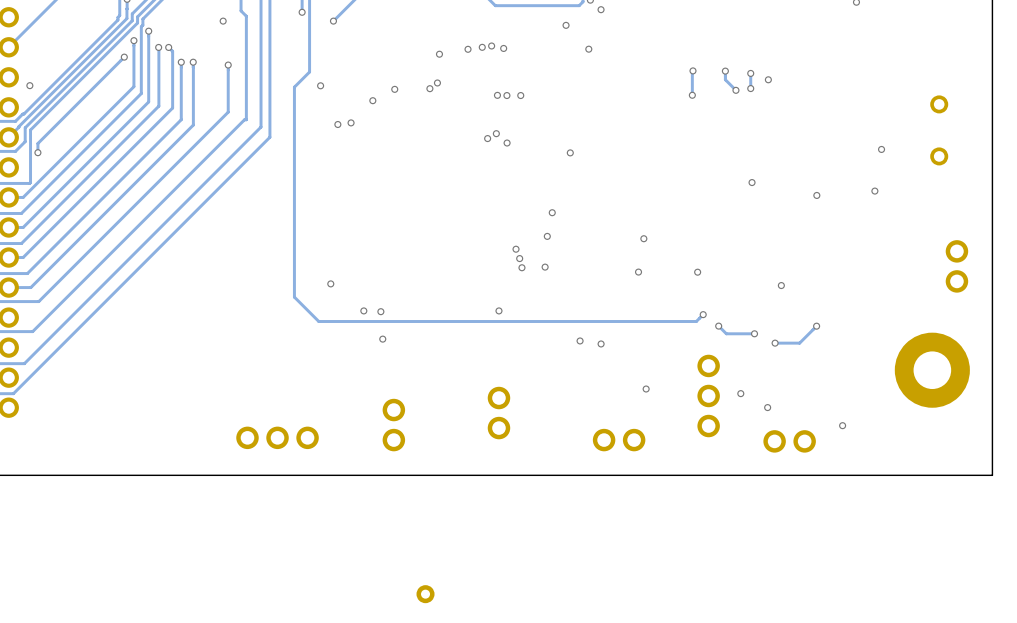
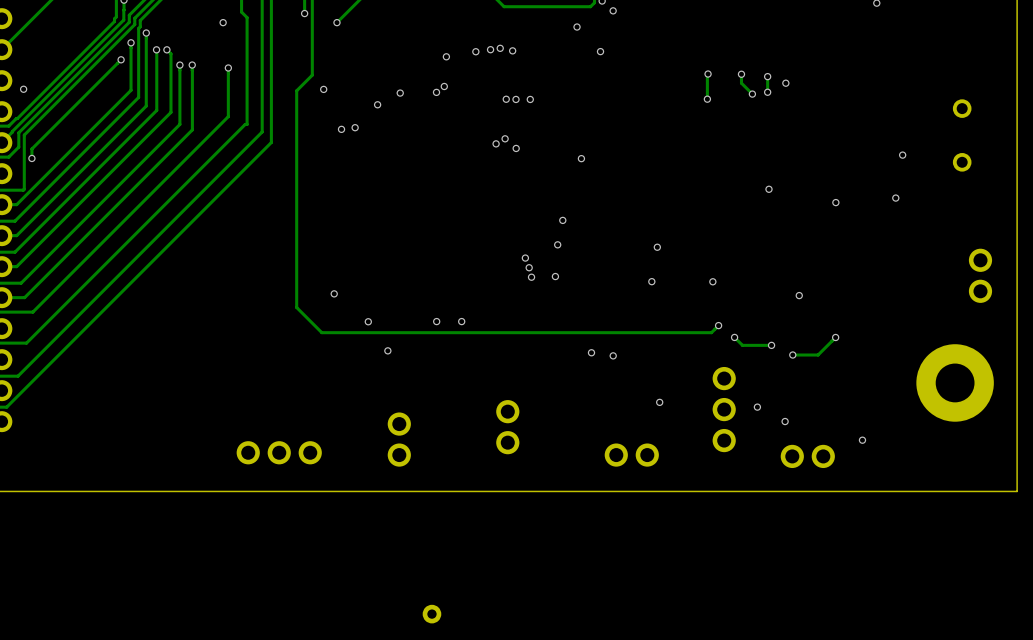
via: none -> (436, 321)
via: none -> (461, 321)
via: (498, 310) -> none
via: (380, 311) -> none

